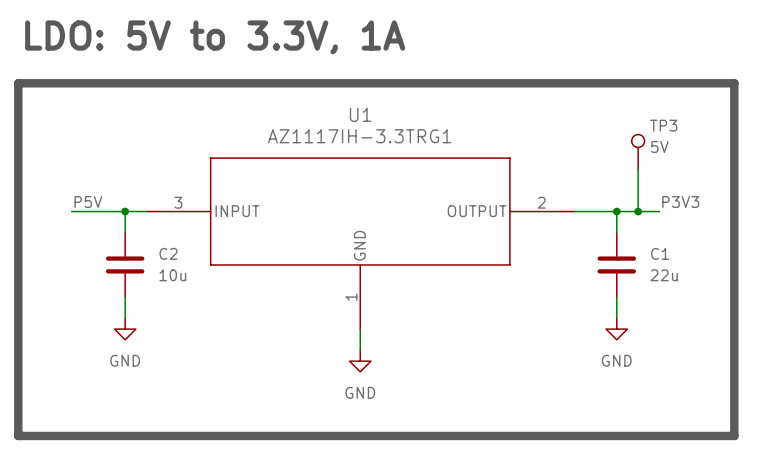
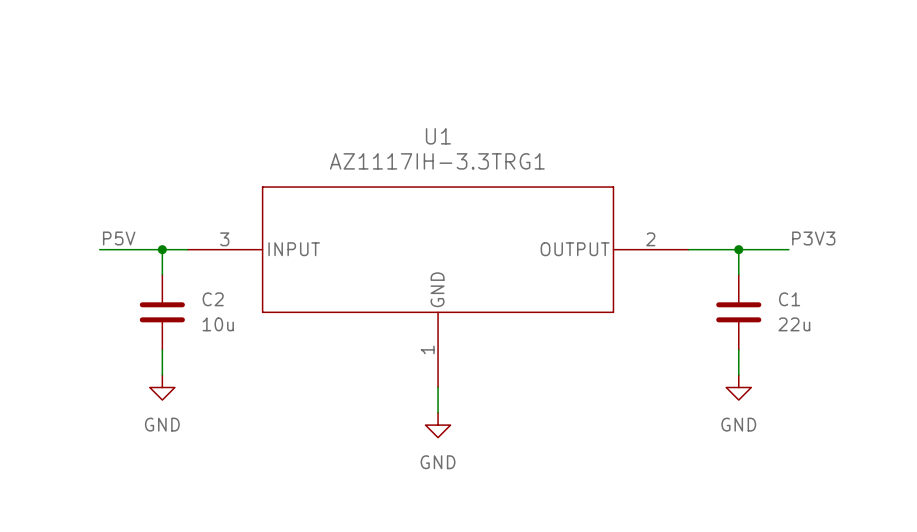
text: LDO: 5V to 3.3V, 1A (215, 37) -> none
line: (18, 83) (734, 83) (734, 435) (18, 435) (18, 83) -> none
TP3: 5V (638, 151) -> none
wire: (638, 168) (638, 211) -> none
junction: (638, 211) -> none

